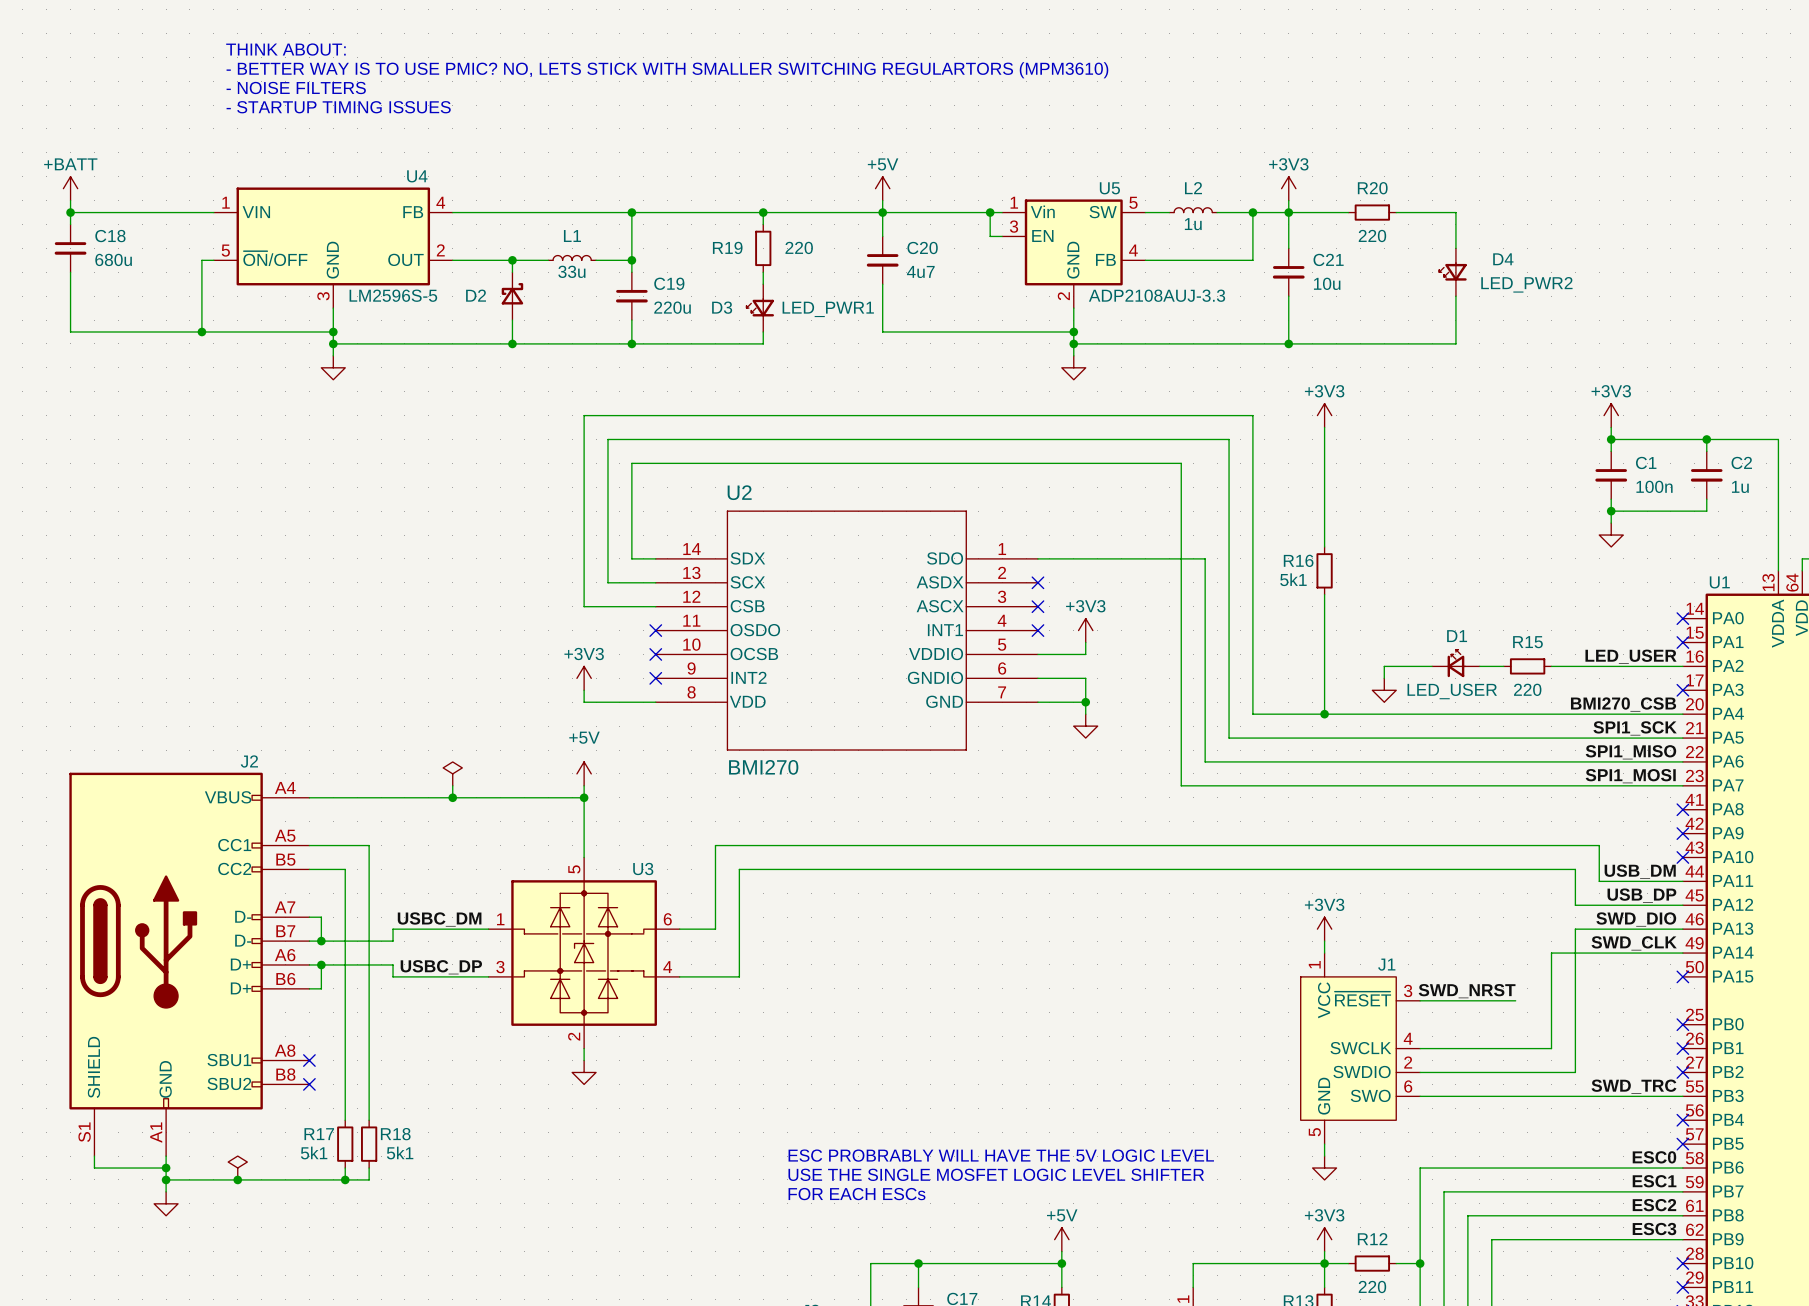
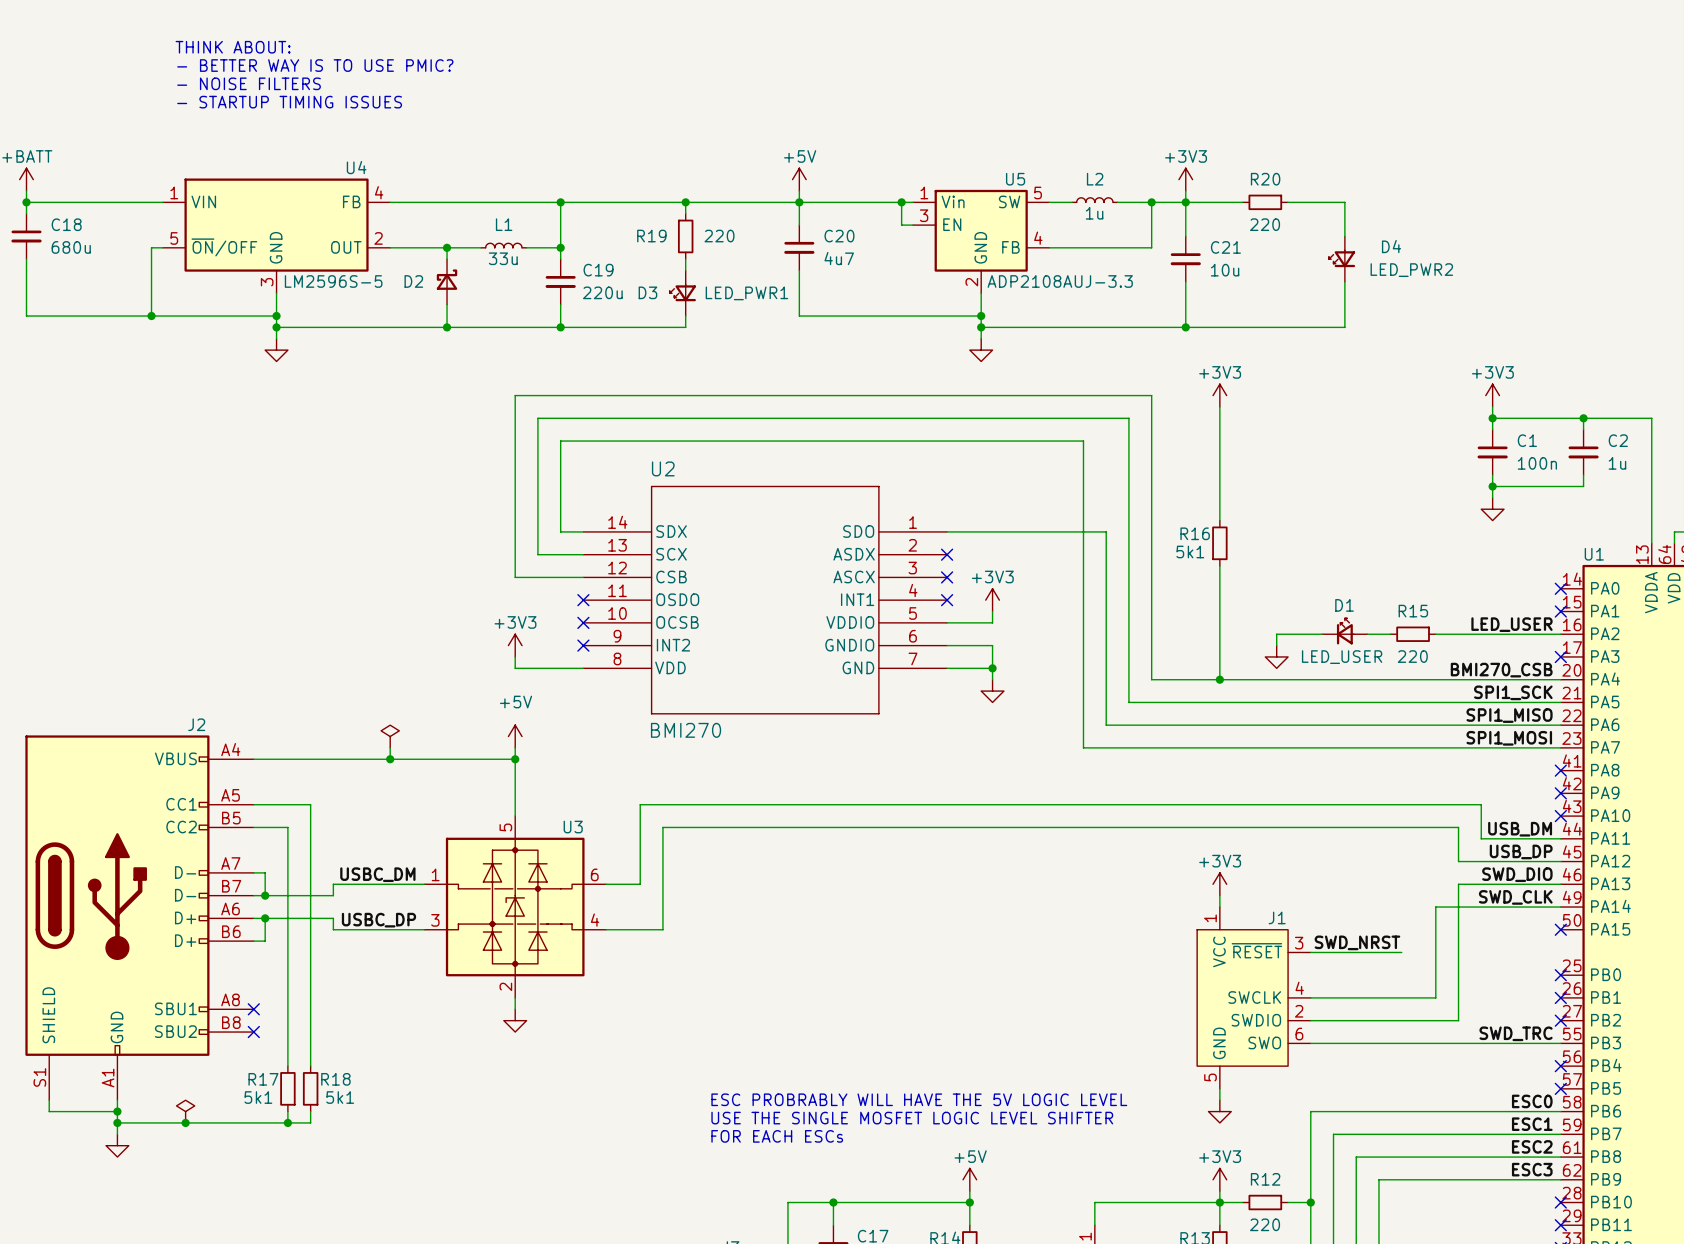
text: - BETTER WAY IS TO USE PMIC? NO, LETS STICK WITH SMALLER SWITCHING REGULARTORS (MPM3610) (667, 70) -> - BETTER WAY IS TO USE PMIC? (315, 65)

